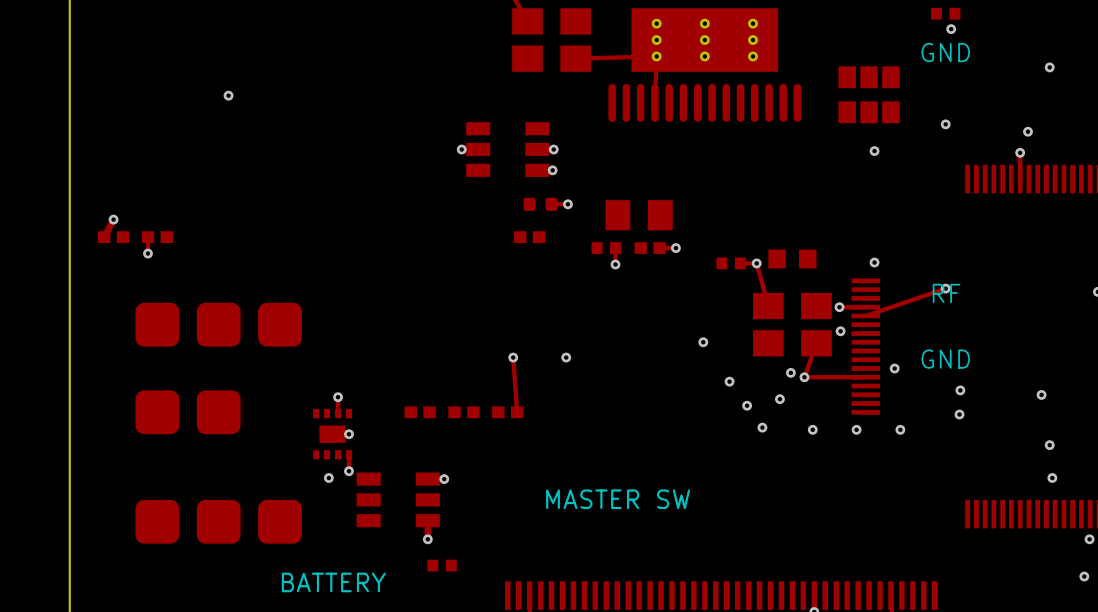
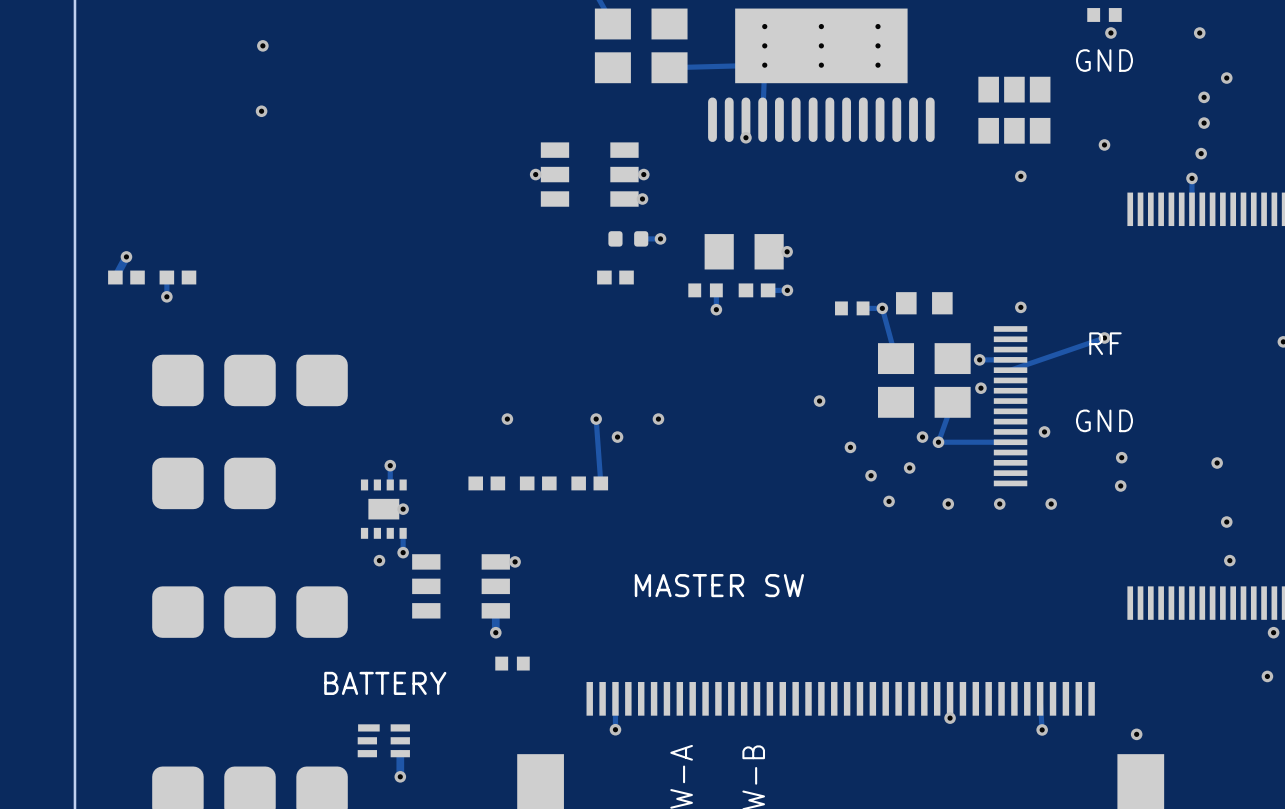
via: none -> (1199, 33)
via: none -> (262, 45)
via: none -> (1204, 97)
via: none -> (1204, 123)
via: none -> (745, 137)
via: none -> (787, 251)
via: none -> (507, 419)
via: none -> (617, 437)

